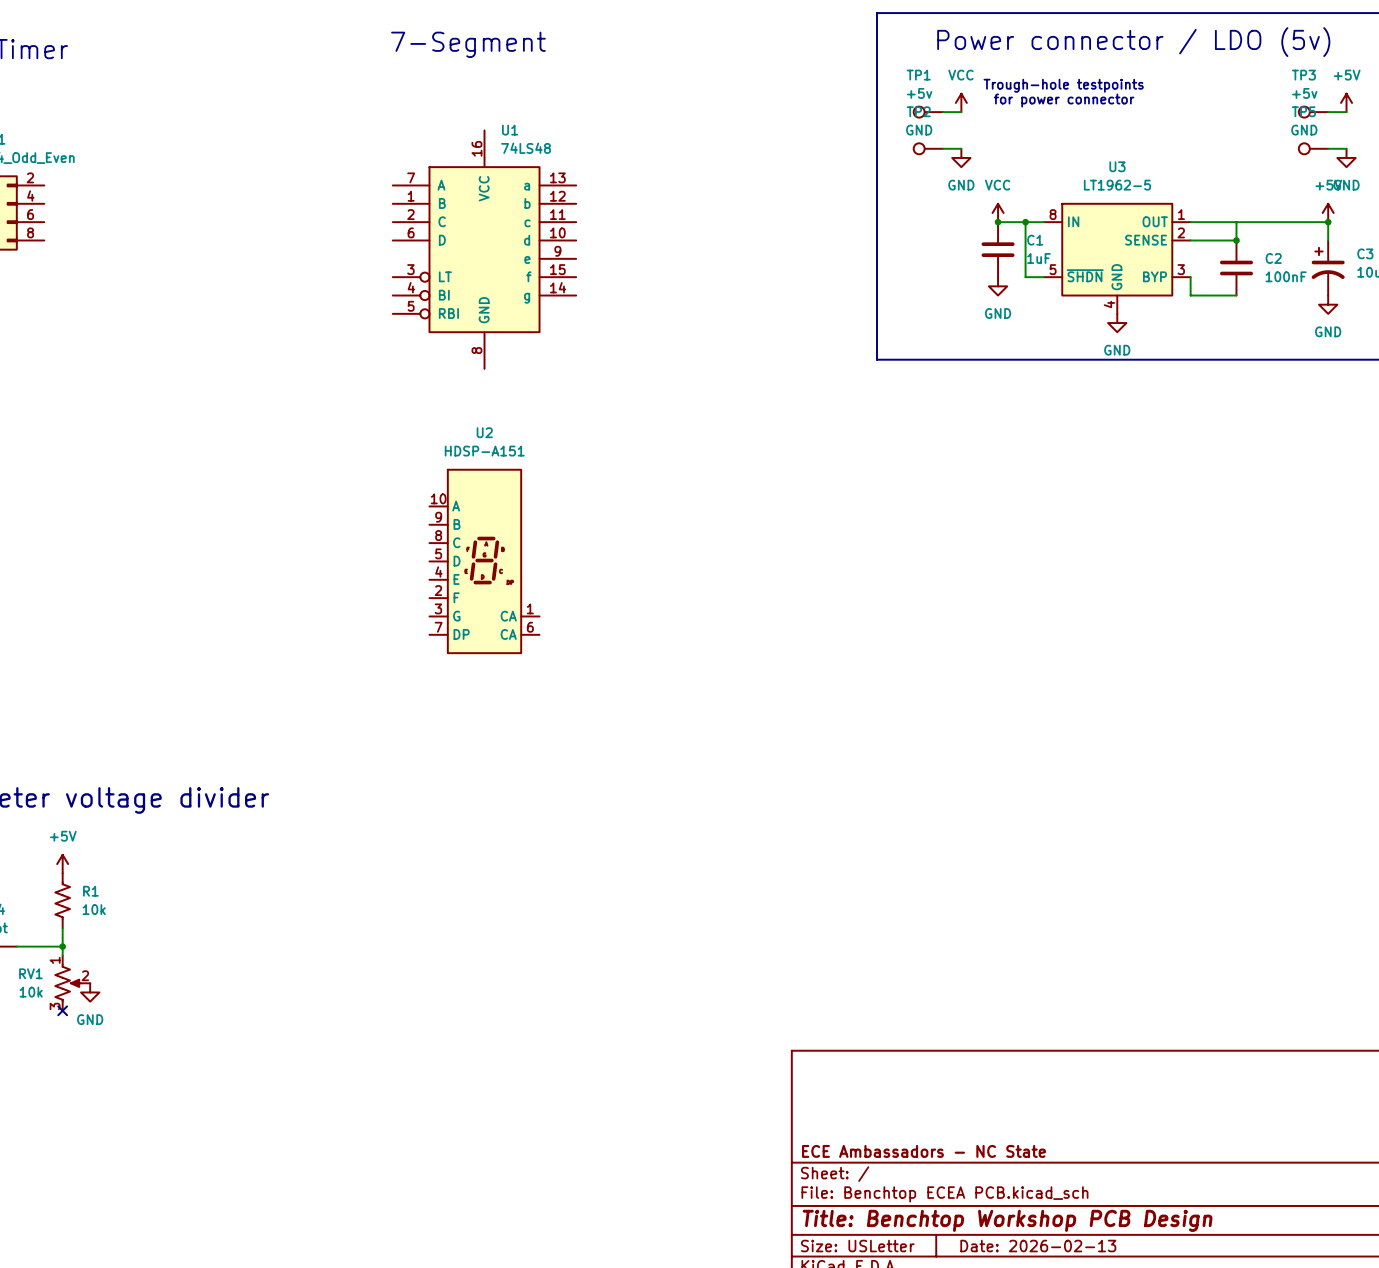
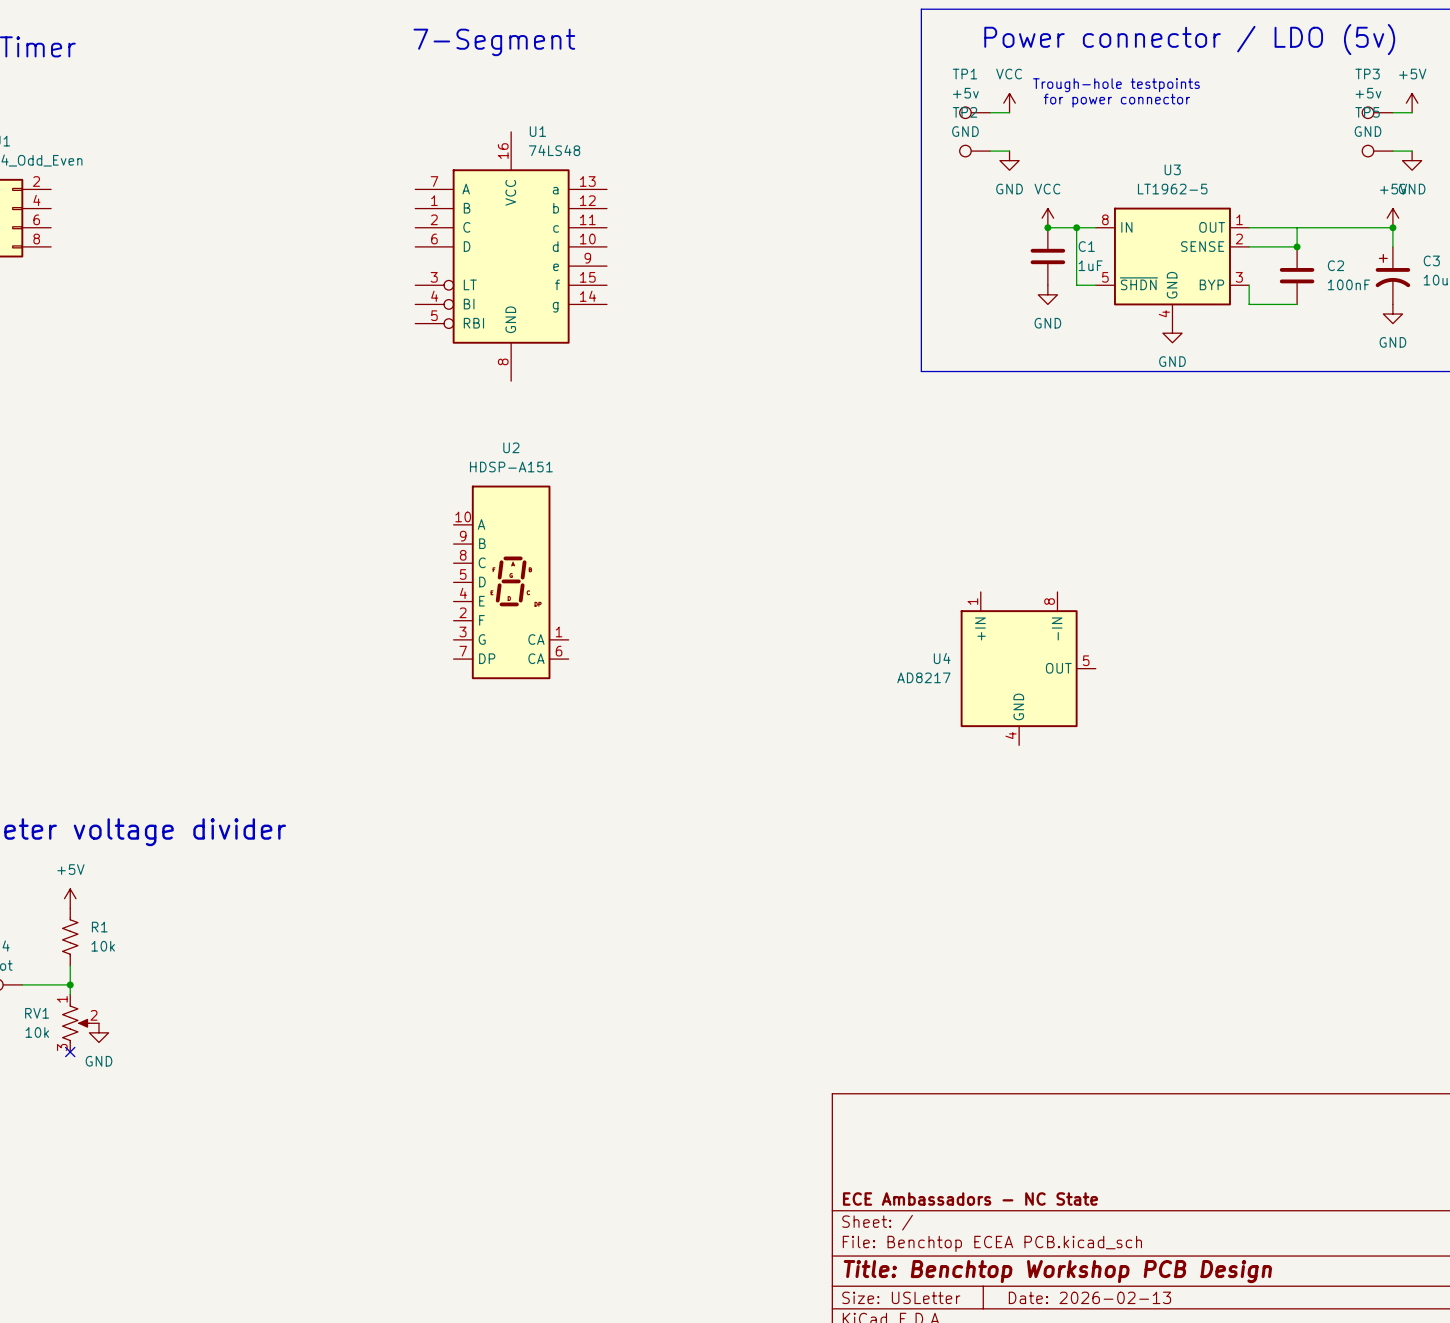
U4: none -> AD8217 (1028, 668)

